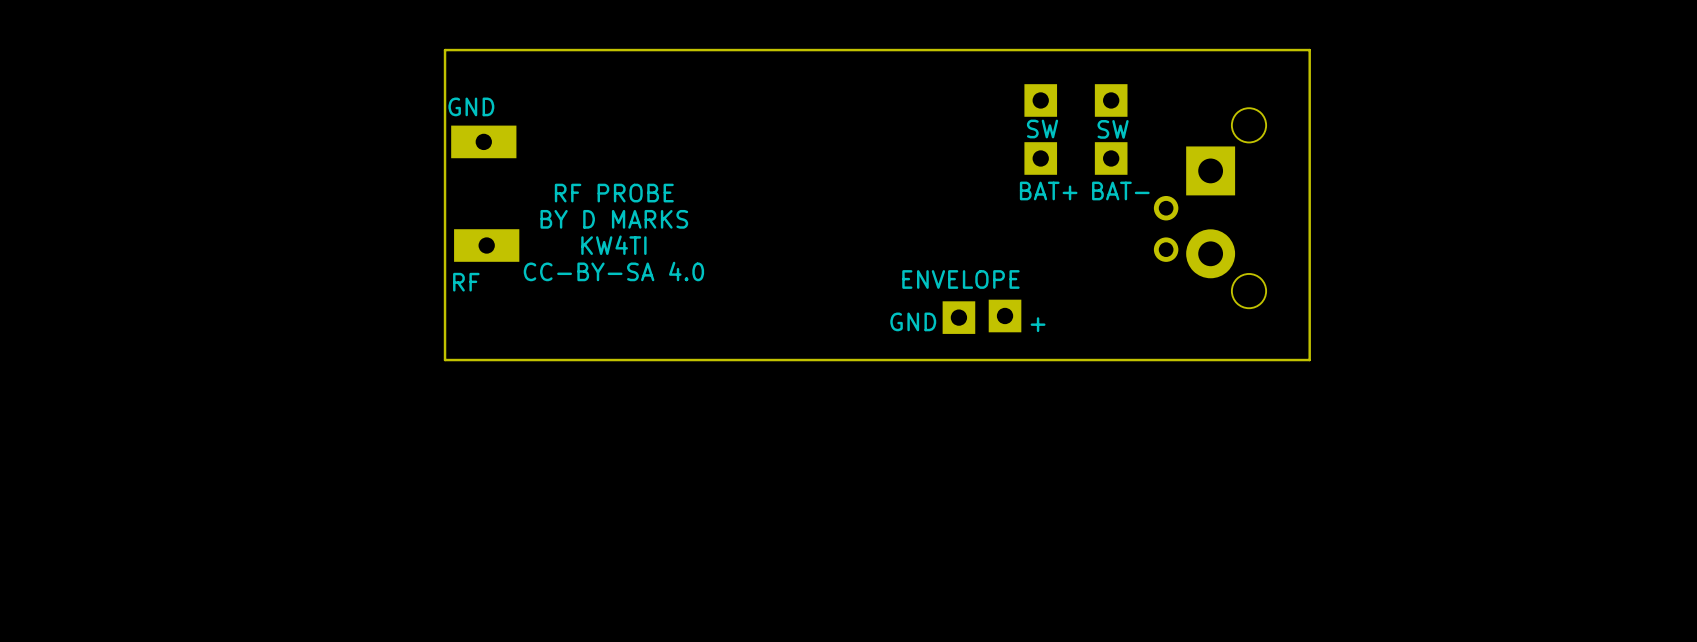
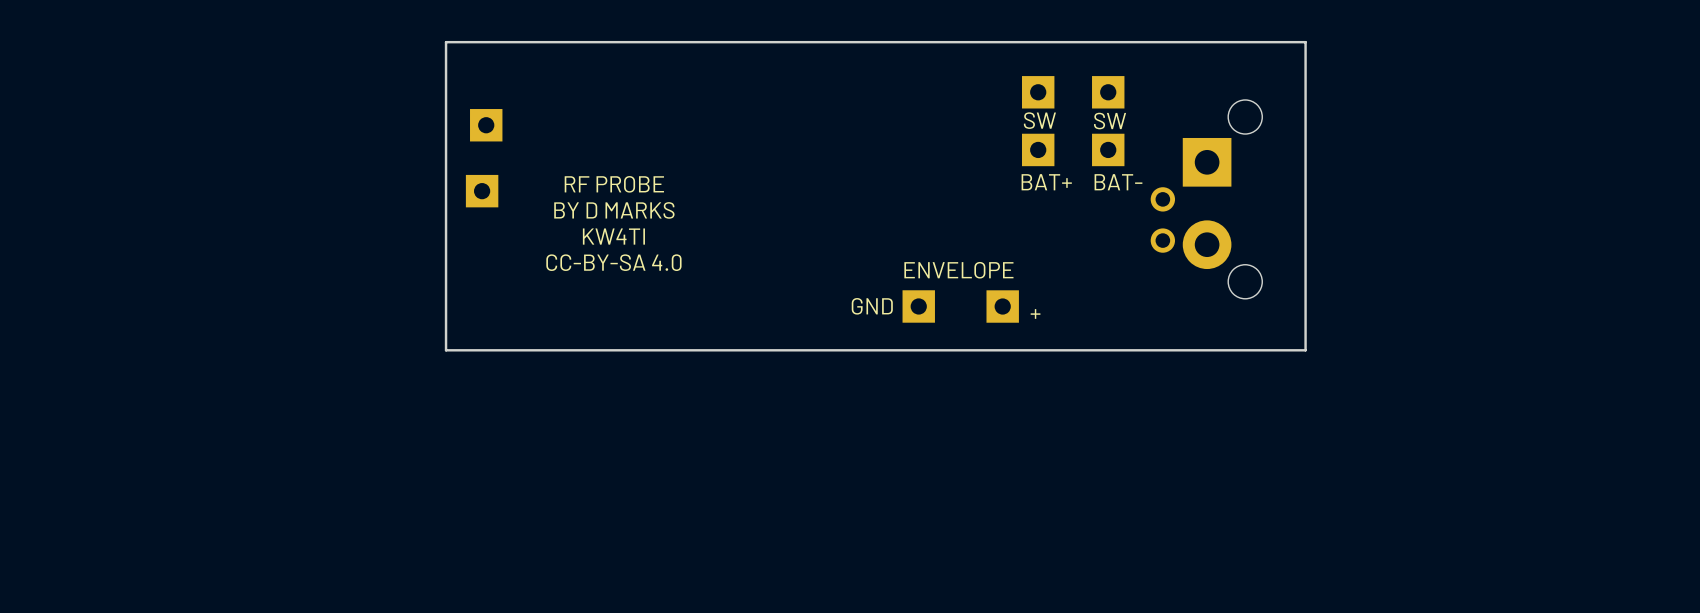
text: GND (471, 106) -> none
part footprint: [451, 125, 517, 159] -> [470, 109, 503, 142]
part: none -> (482, 191)
part: (486, 245) -> none
text: RF (466, 282) -> none
part position: (958, 317) -> (918, 306)
text position: GND (913, 321) -> GND (872, 306)

